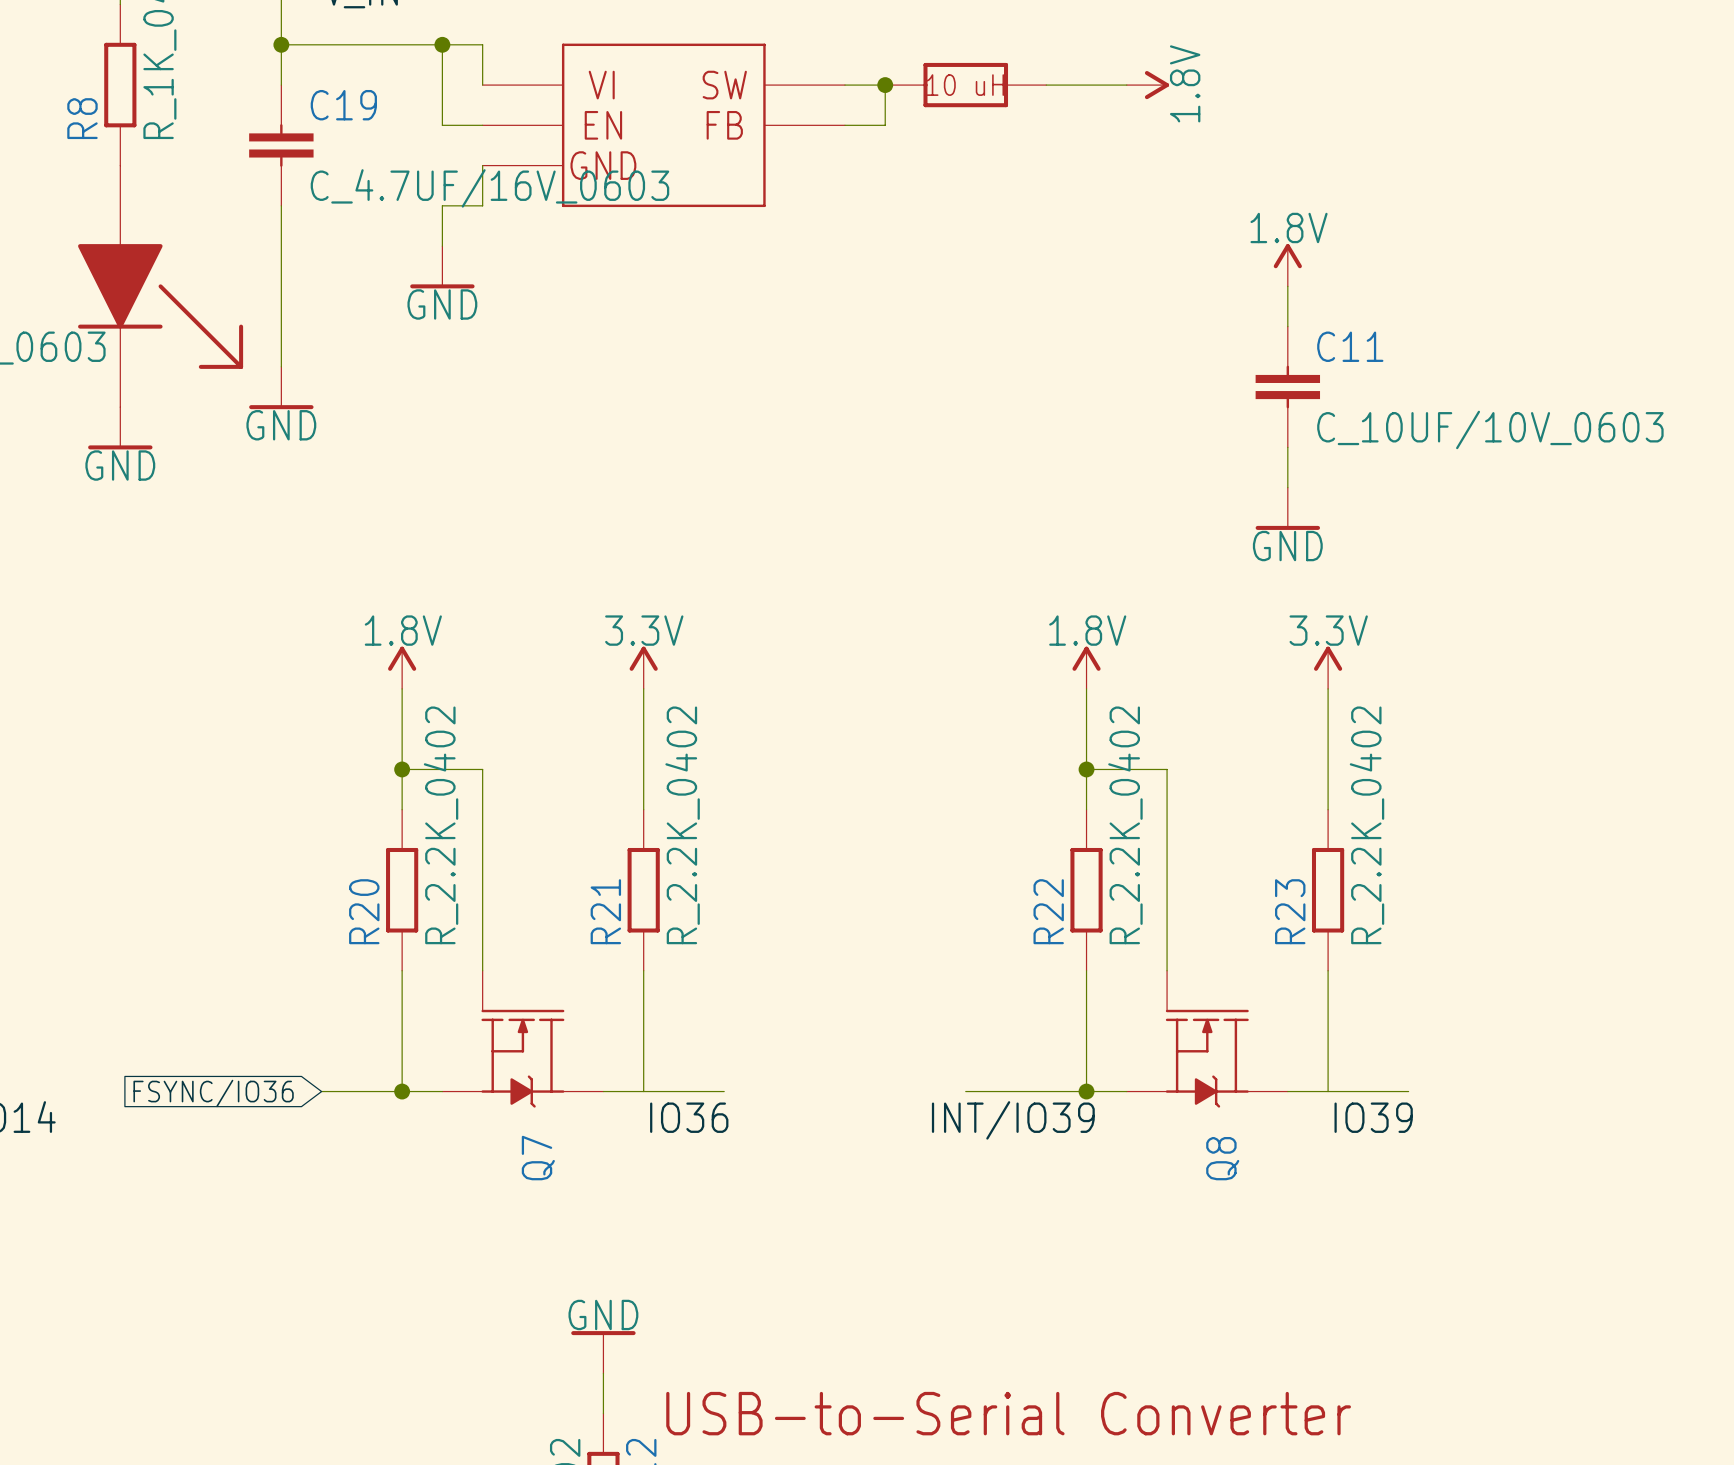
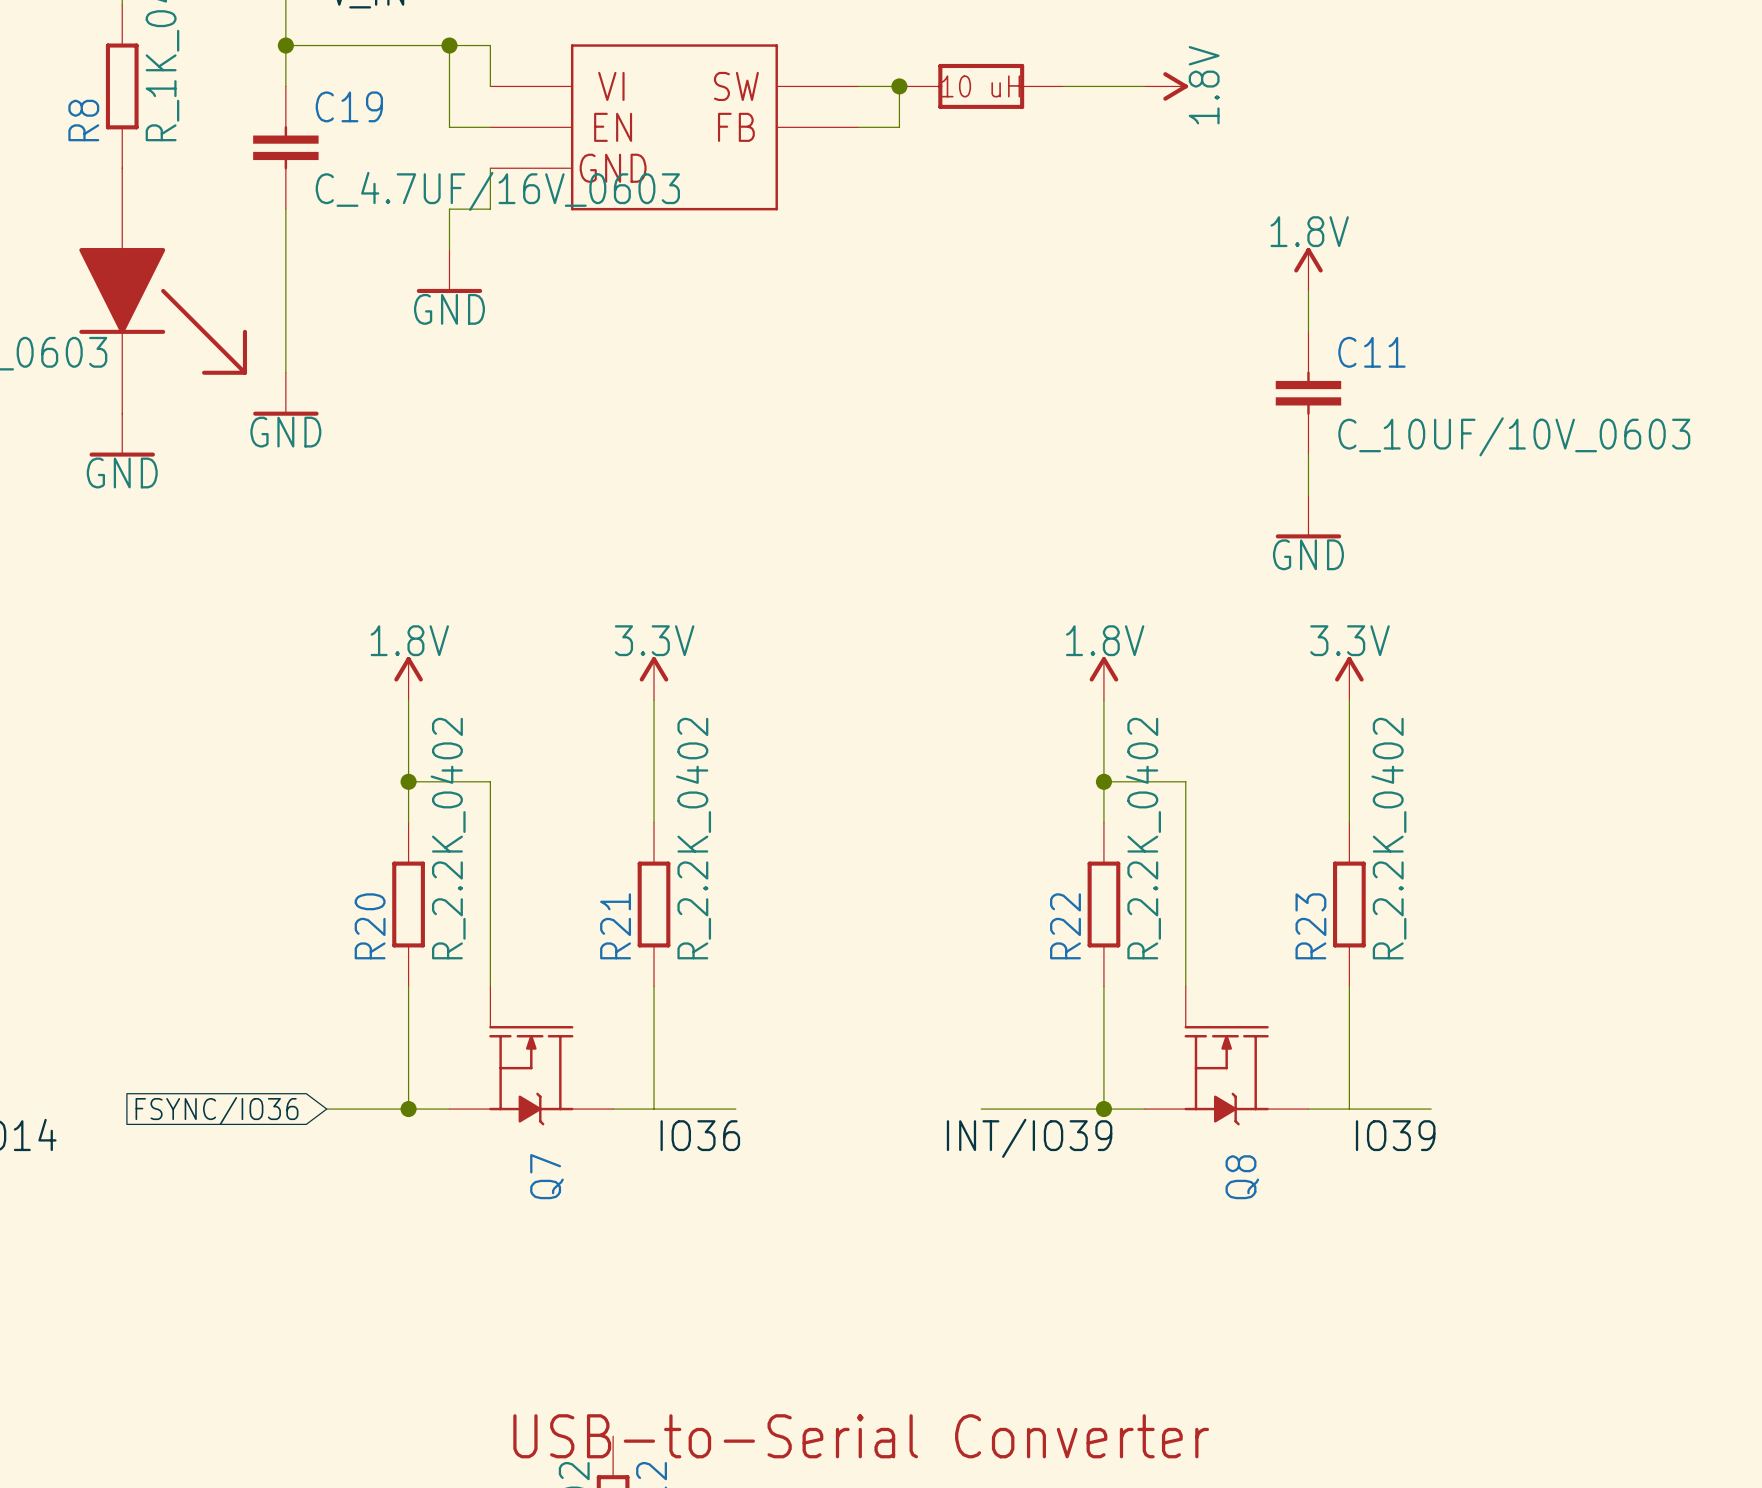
power symbol: GND (603, 1352) -> none
wire: (603, 1373) (603, 1413) -> none
text position: USB-to-Serial Converter (1008, 1413) -> USB-to-Serial Converter (861, 1436)

